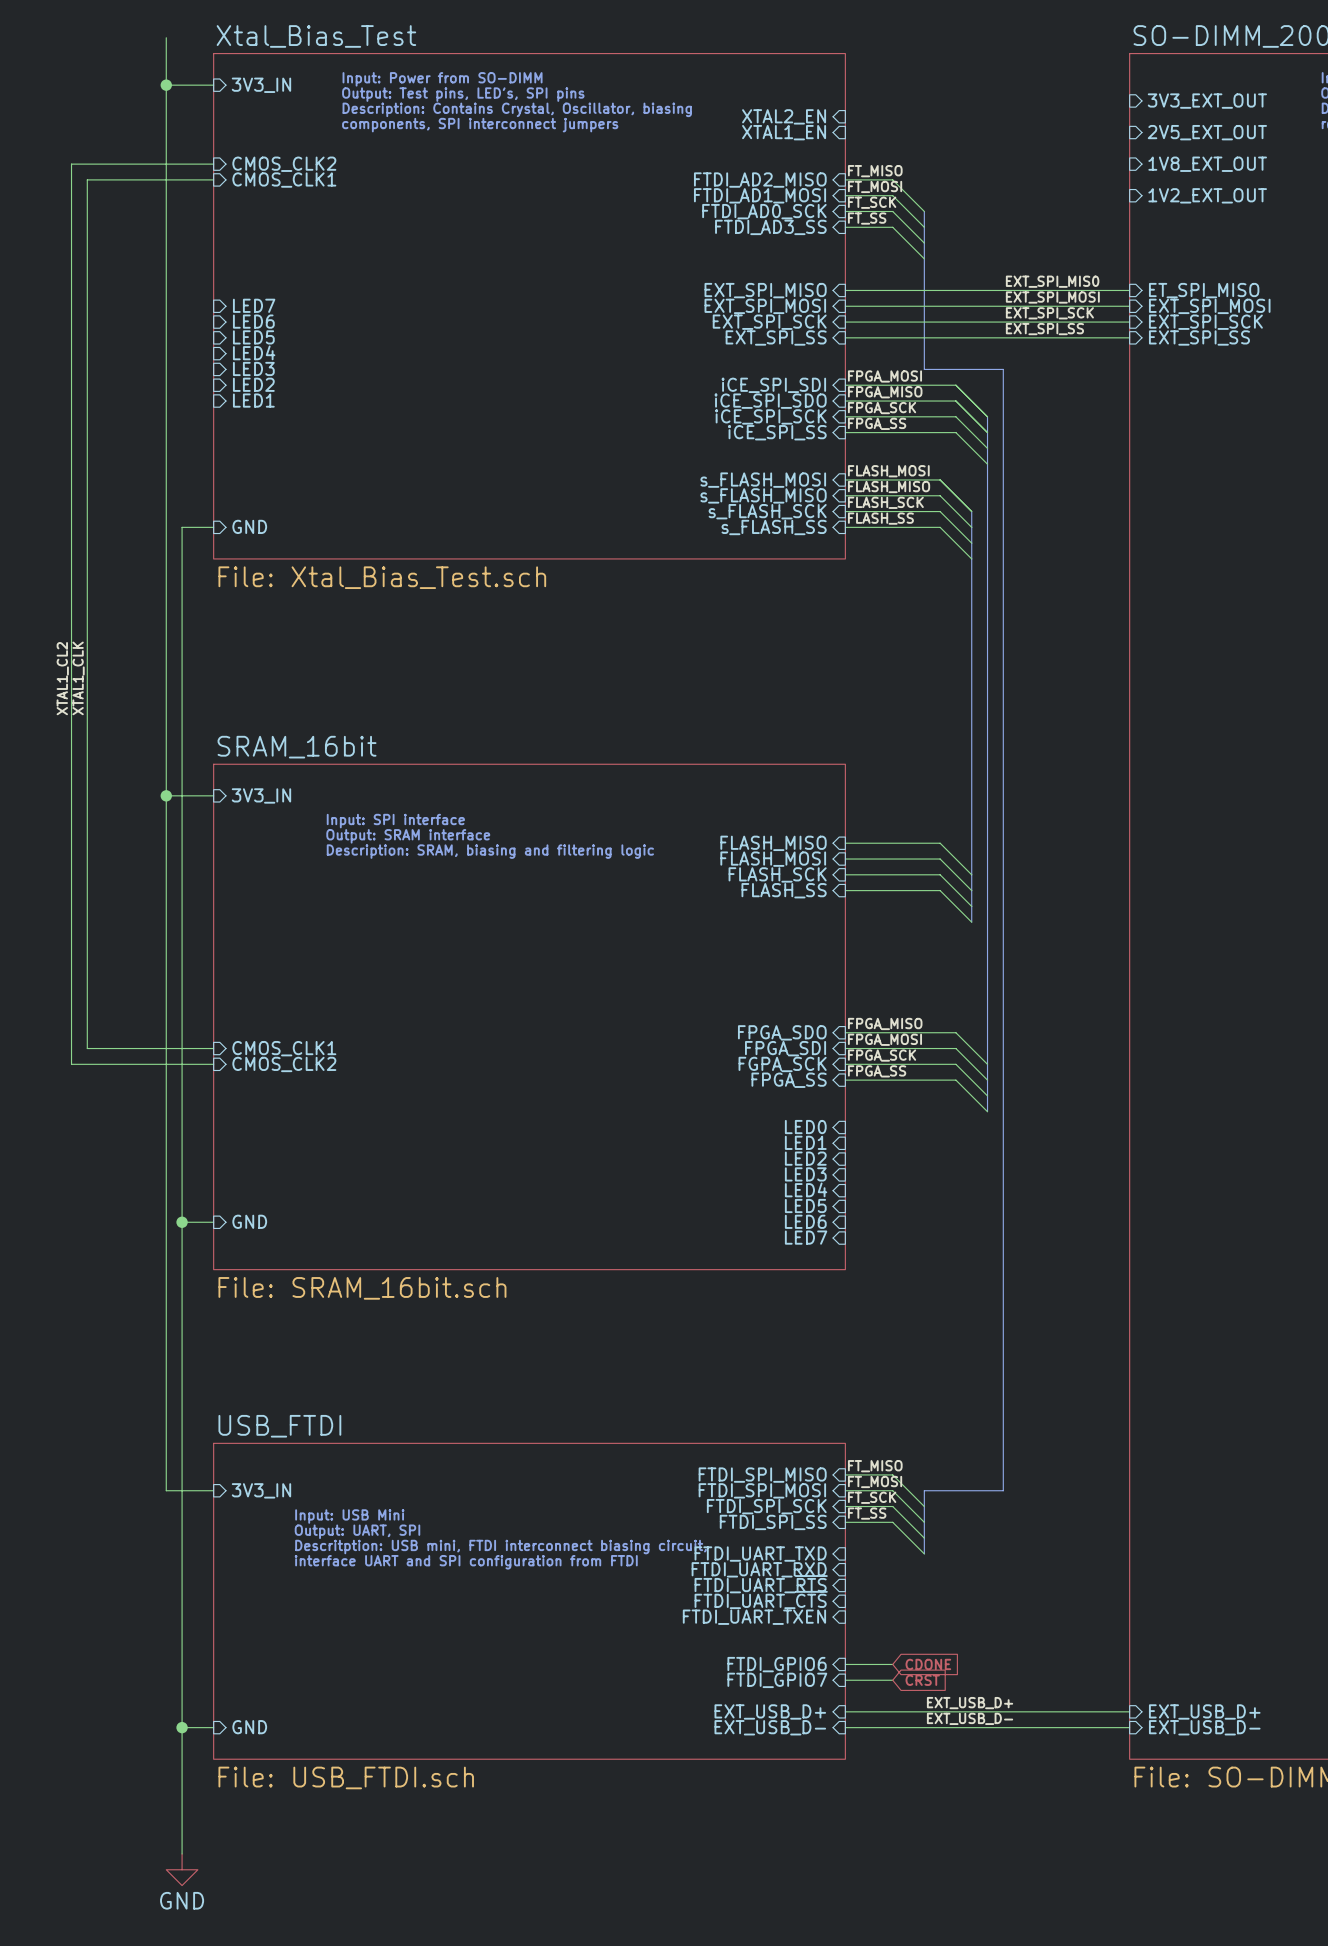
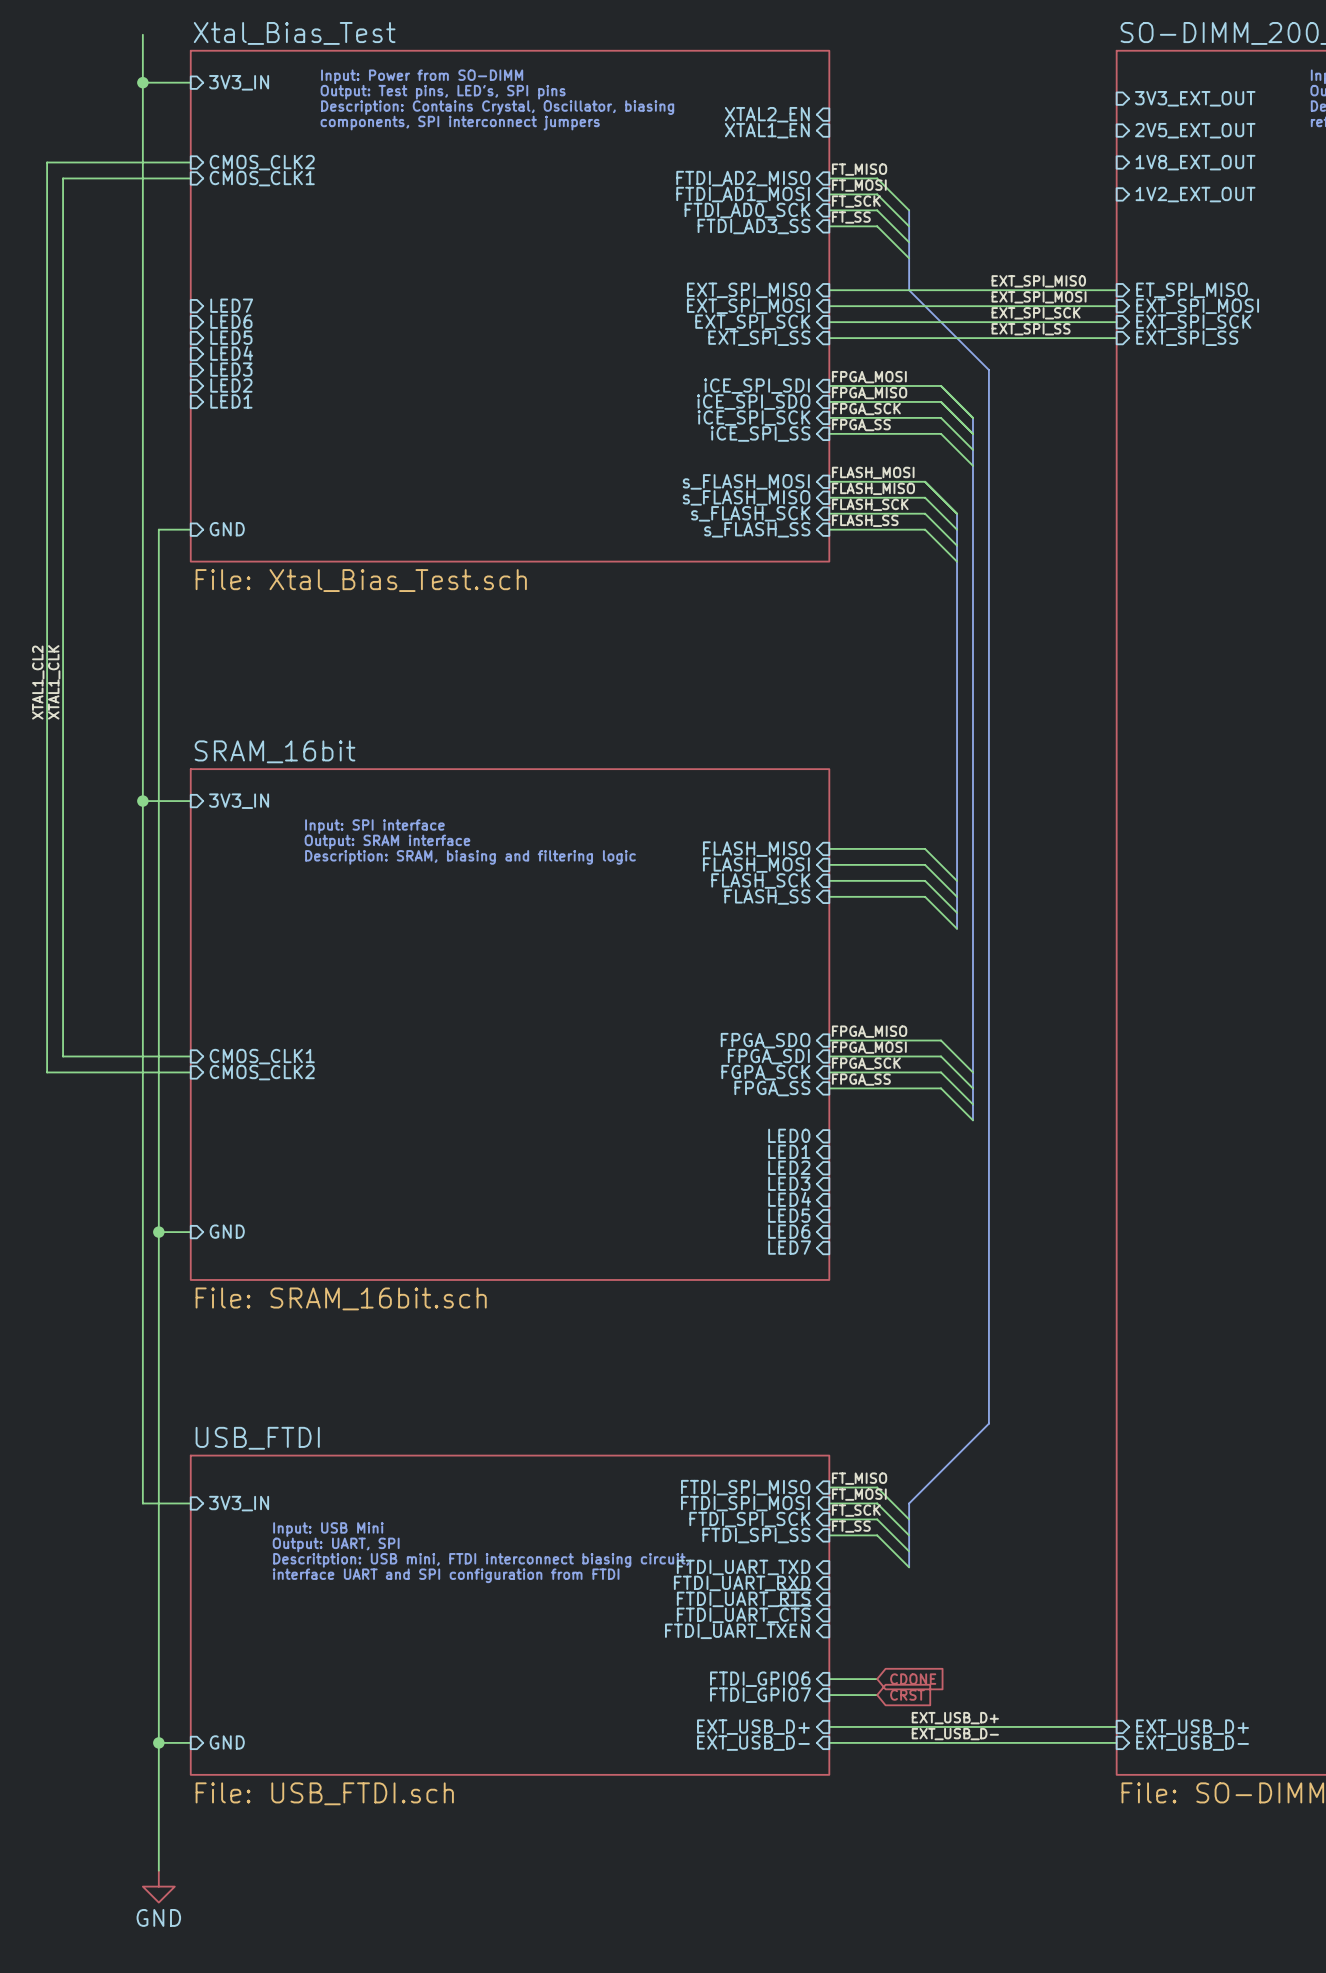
bus: (924, 290) (924, 369) (1003, 369) -> (909, 290) (988, 370)
bus: (1003, 1411) (1003, 1490) (924, 1490) -> (988, 1423) (909, 1503)

